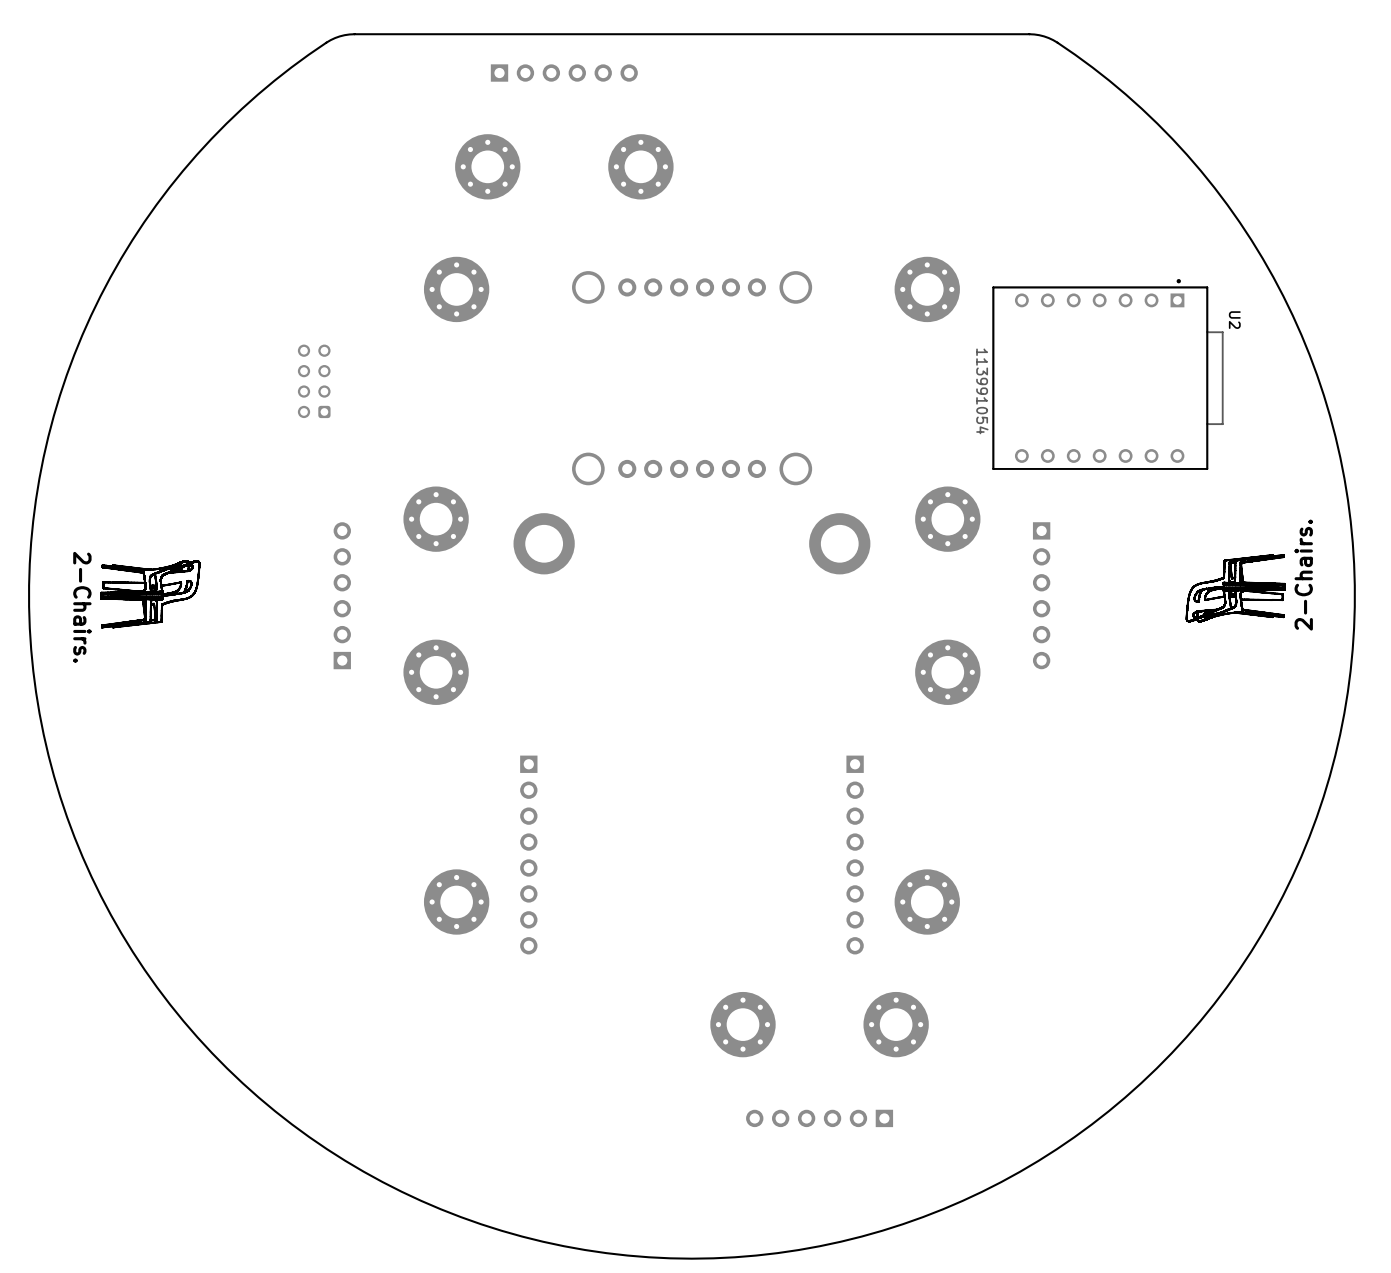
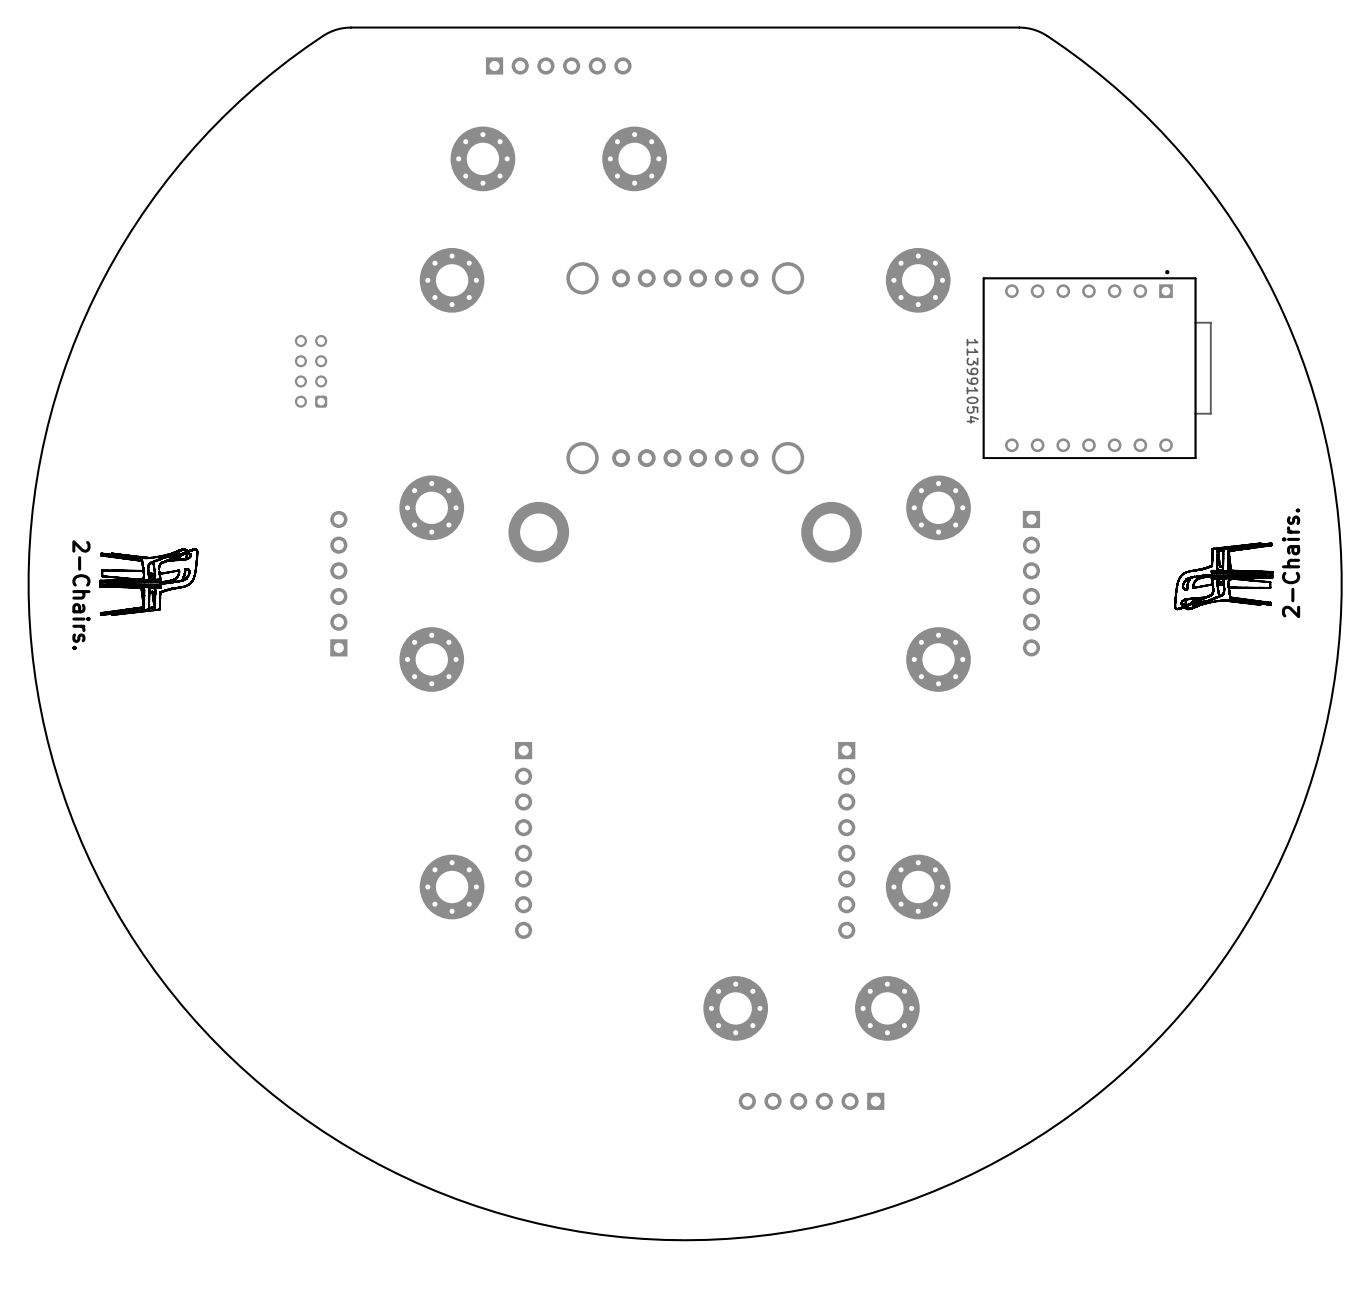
U2 name: U2 (1234, 320) -> none

